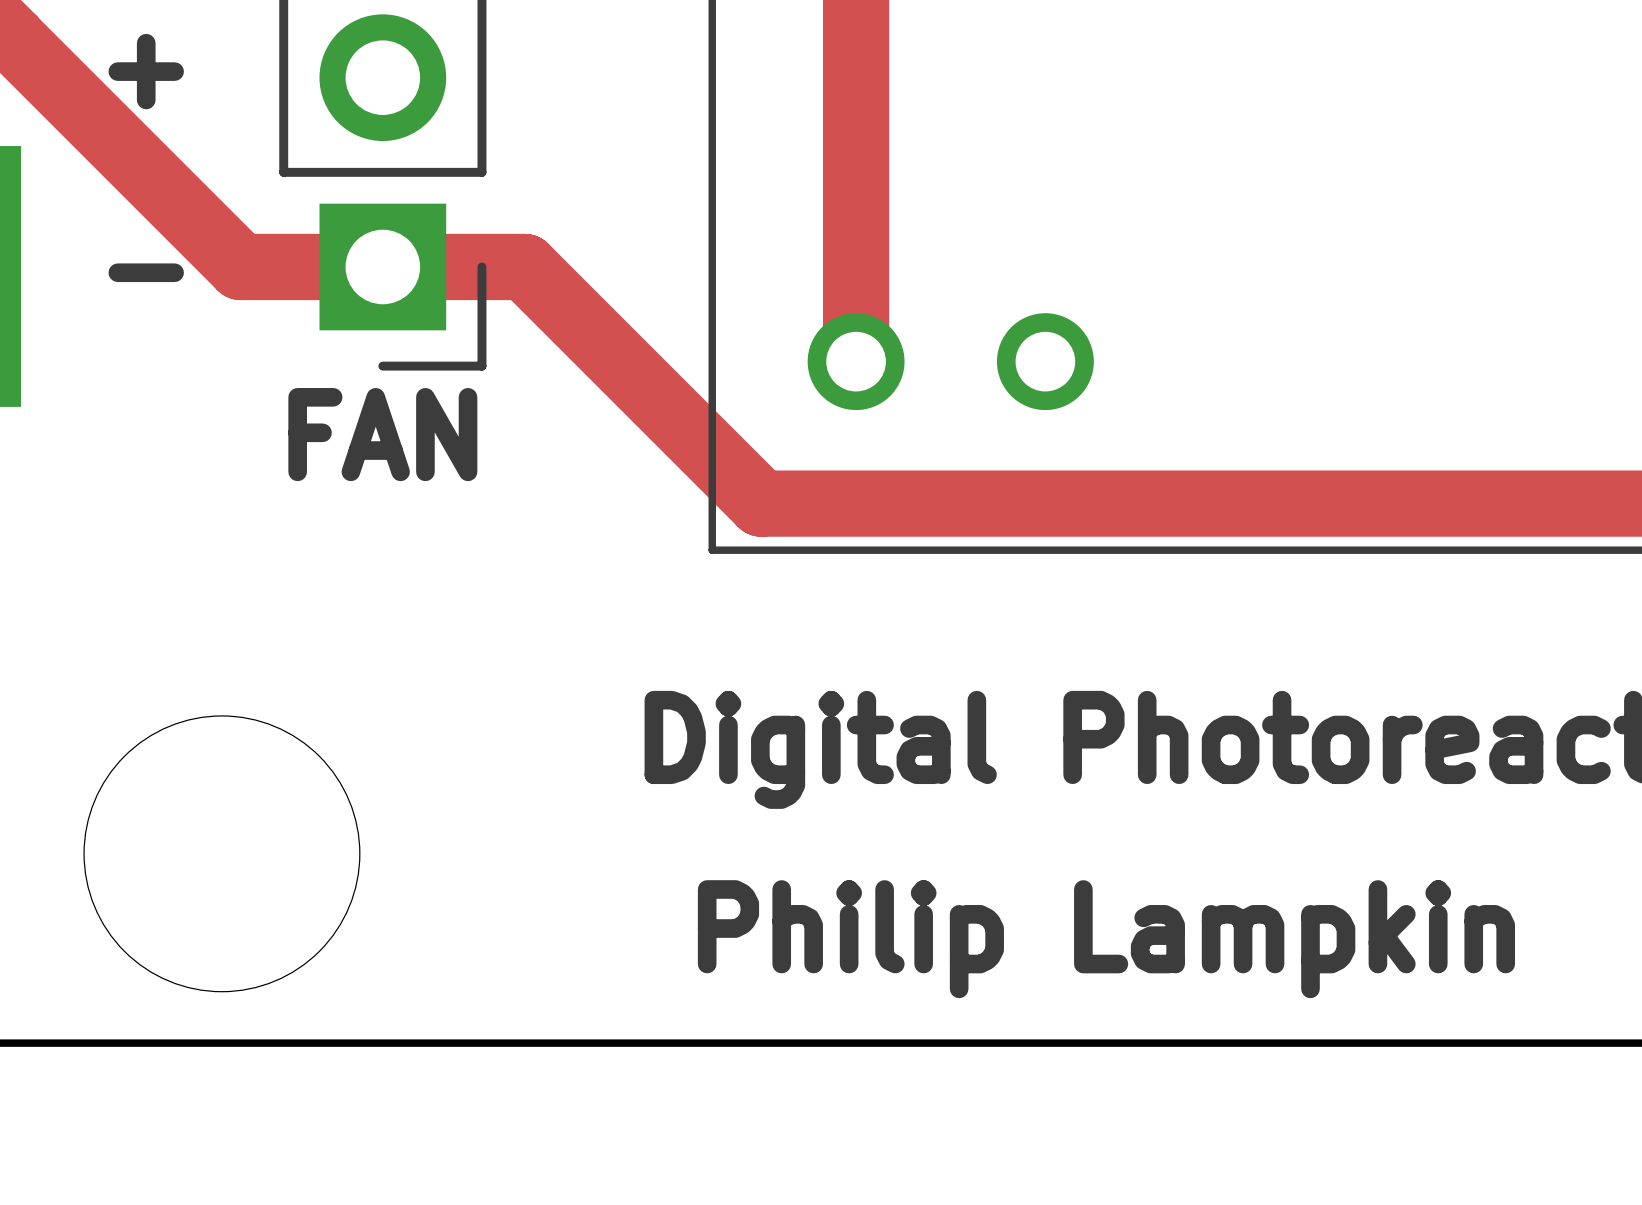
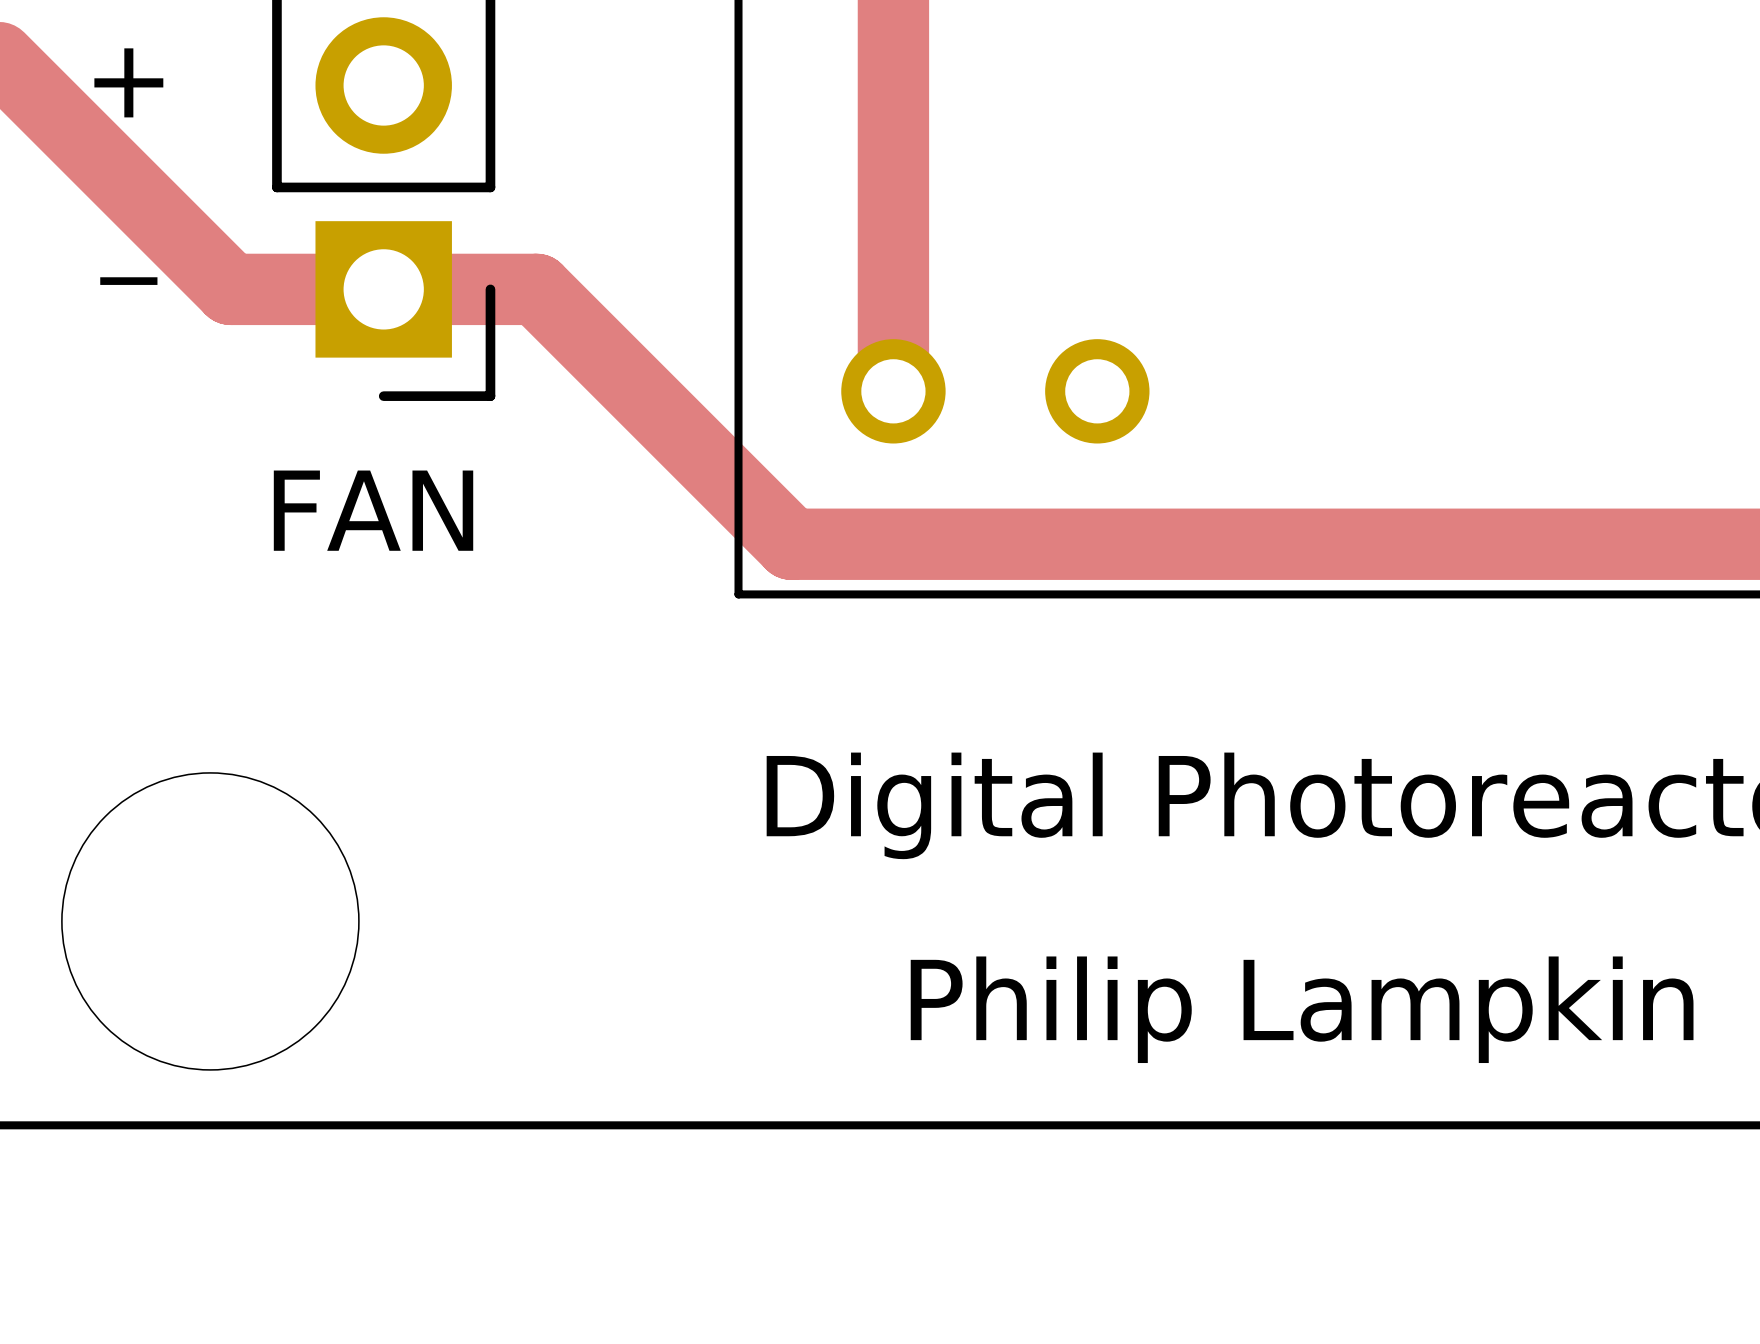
text position: FAN (382, 434) -> FAN (373, 510)

